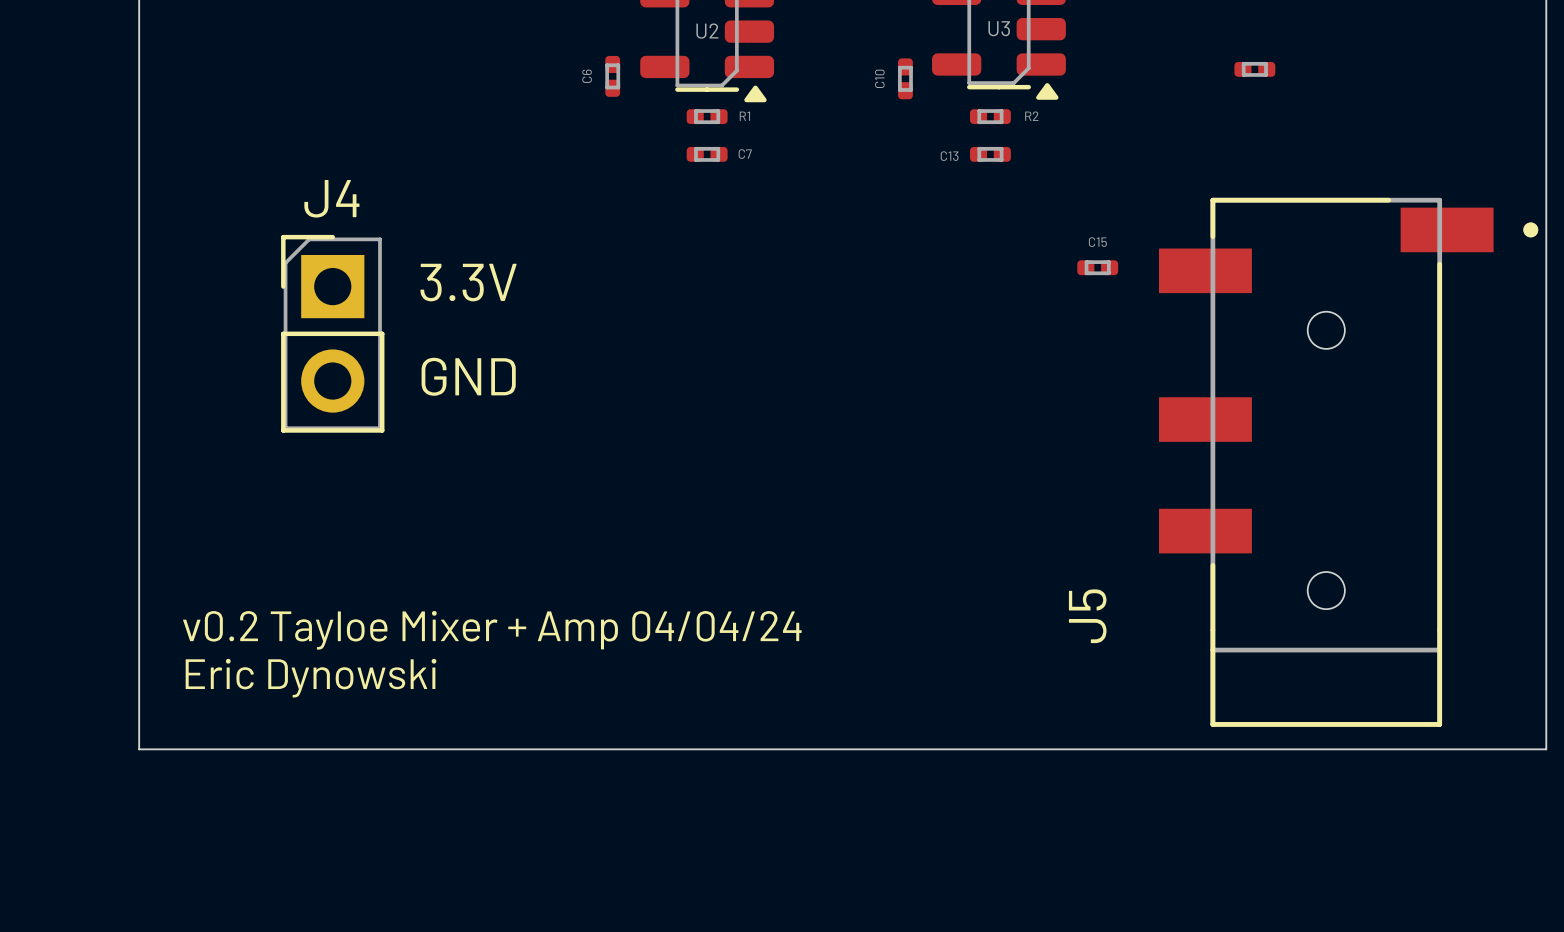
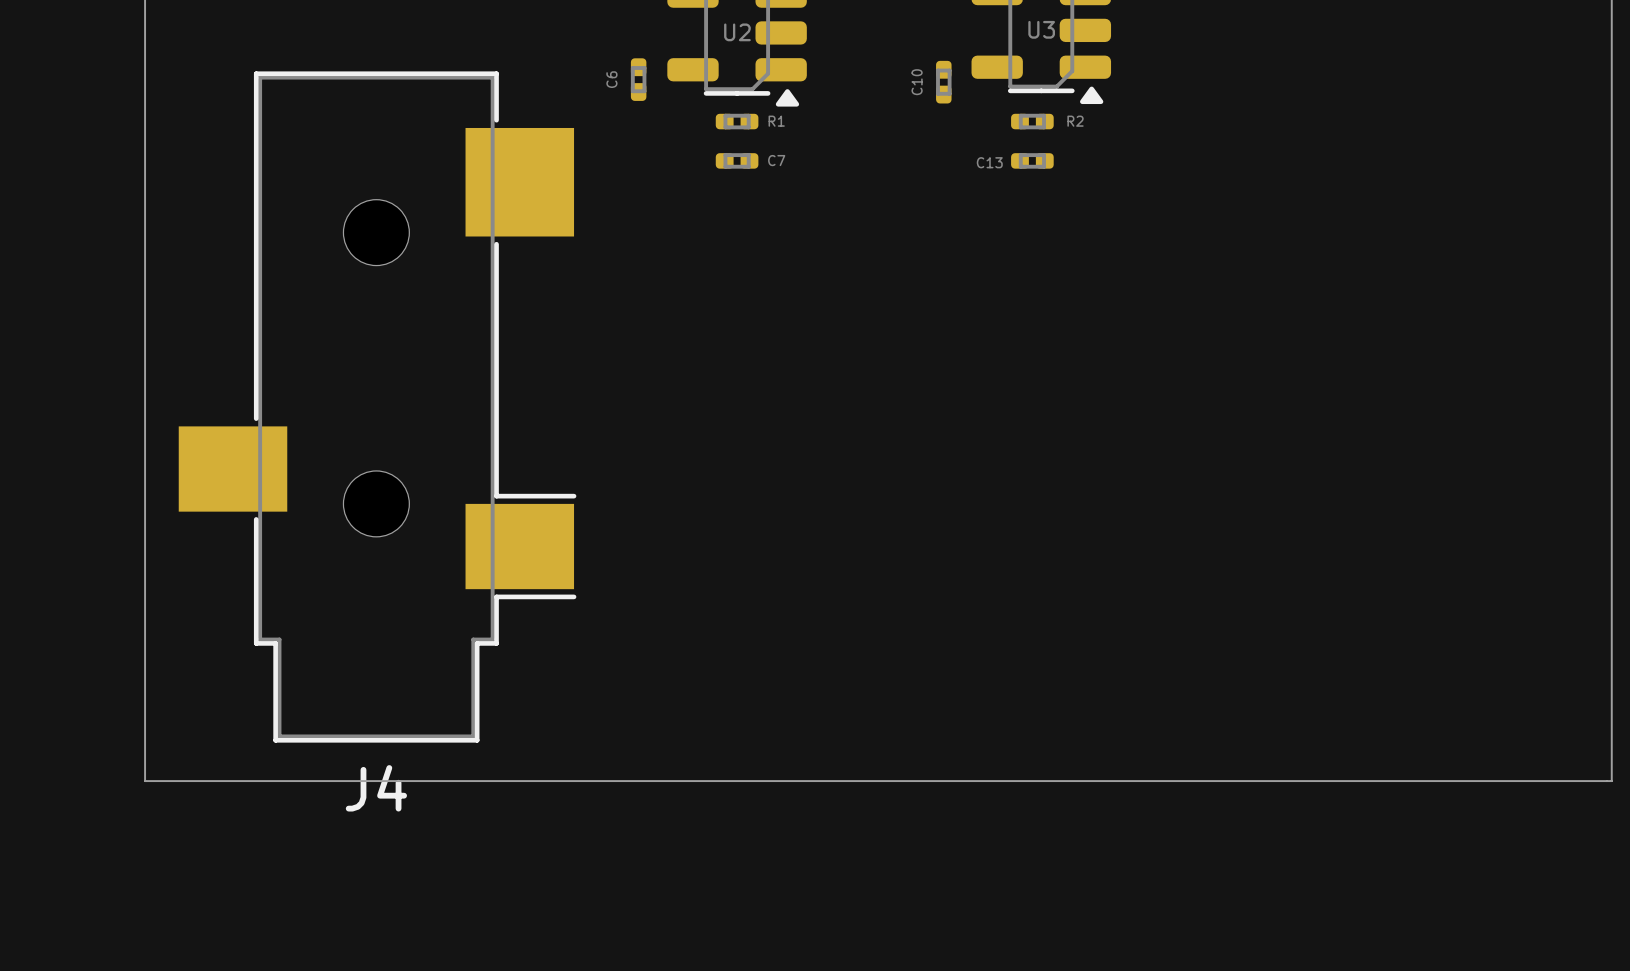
part: (1254, 69) -> none
J4 name position: J4 (331, 198) -> J4 (376, 788)
J4 footprint: [281, 234, 385, 433] -> [178, 71, 577, 743]
C15: (1097, 267) -> none
text: 3.3V (468, 282) -> none
text: GND (468, 376) -> none
J5: (1348, 462) -> none
text: v0.2 Tayloe Mixer + Amp 04/04/24 (492, 630) -> none
text: Eric Dynowski (311, 678) -> none

